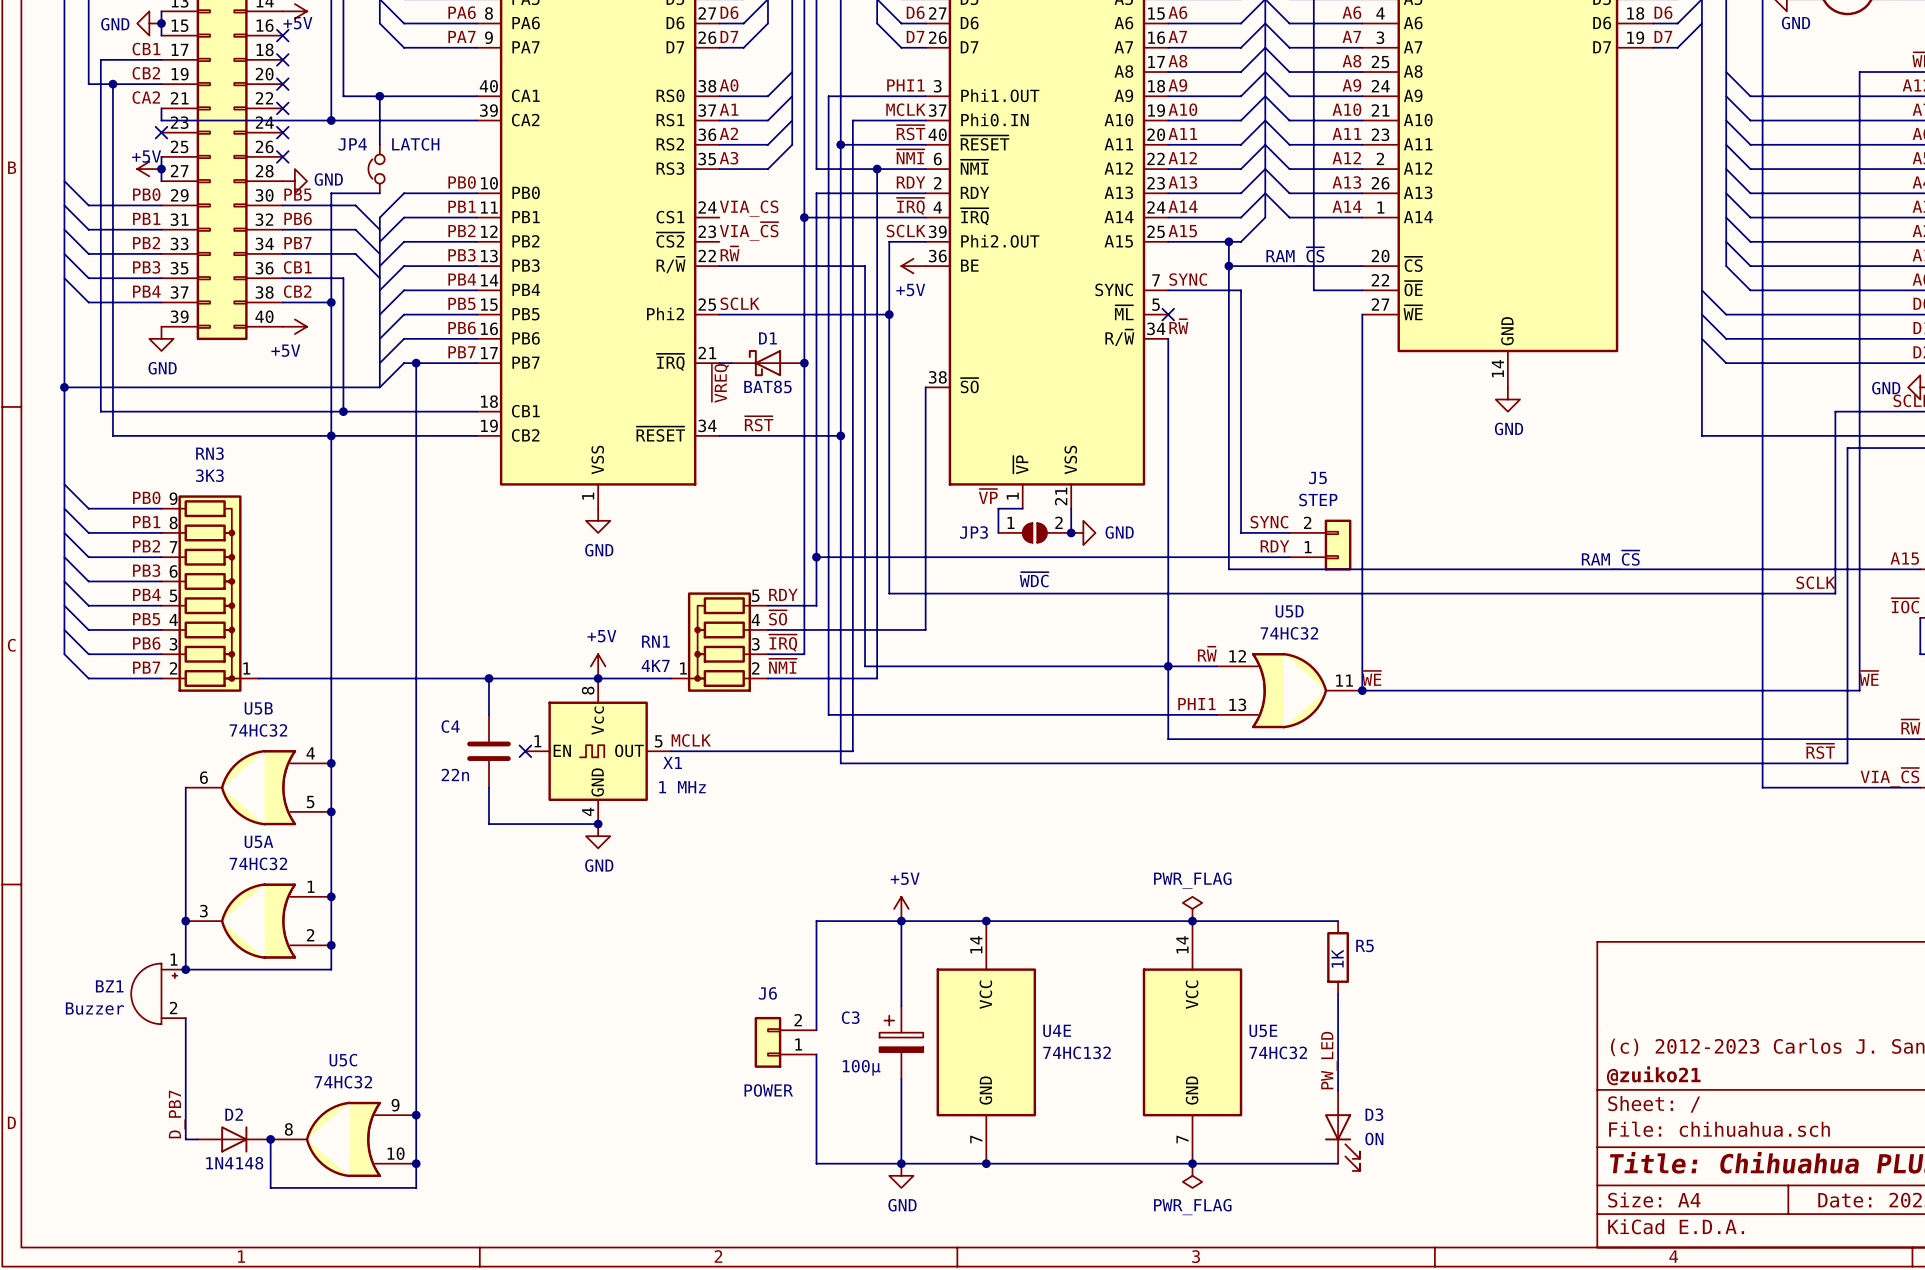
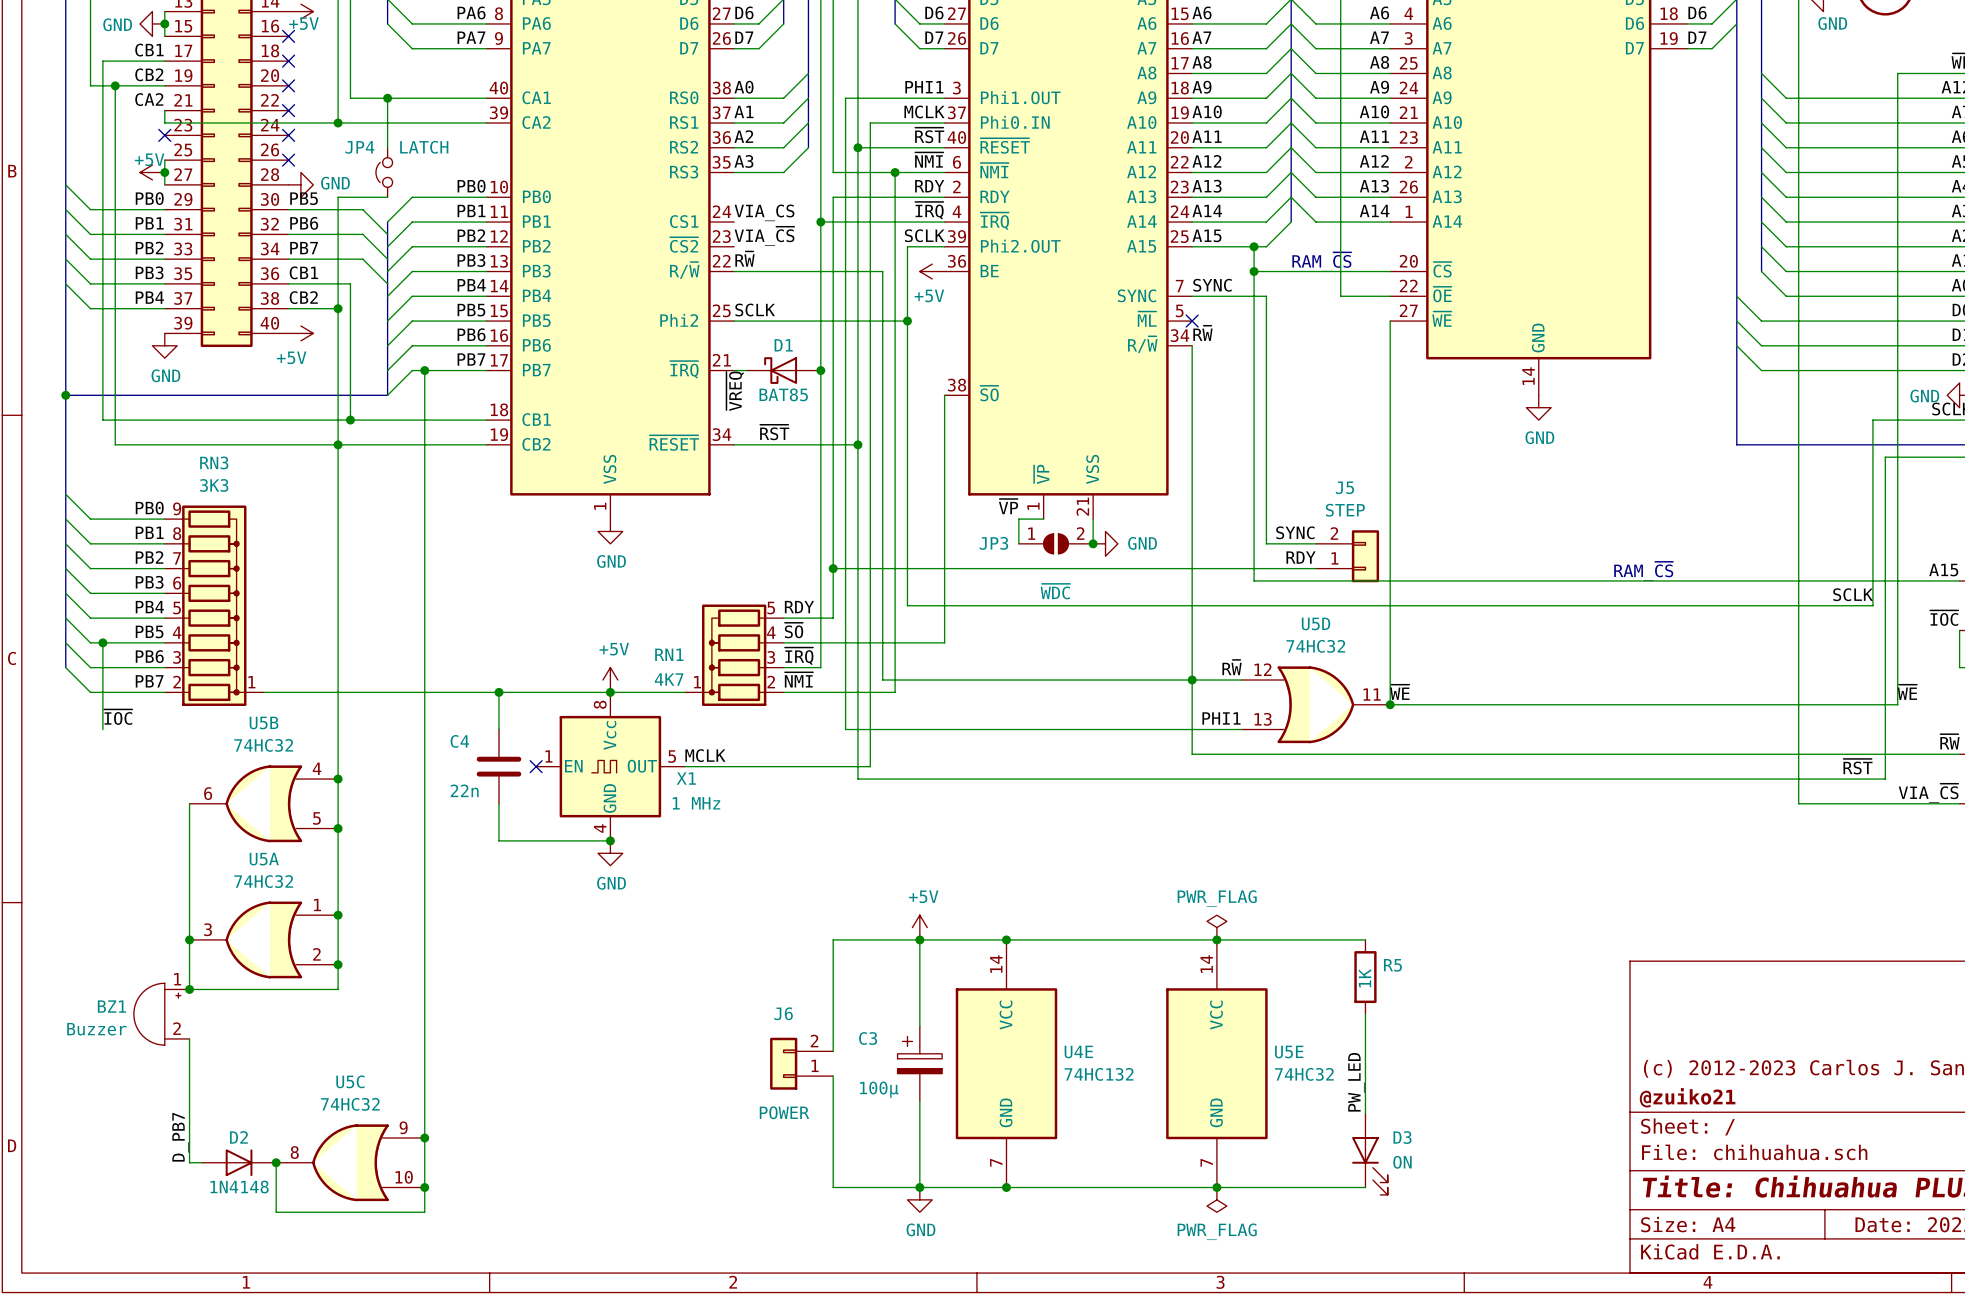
wire: none -> (102, 642) (102, 729)
junction: none -> (102, 642)
label: none -> ~{IOC} (118, 717)

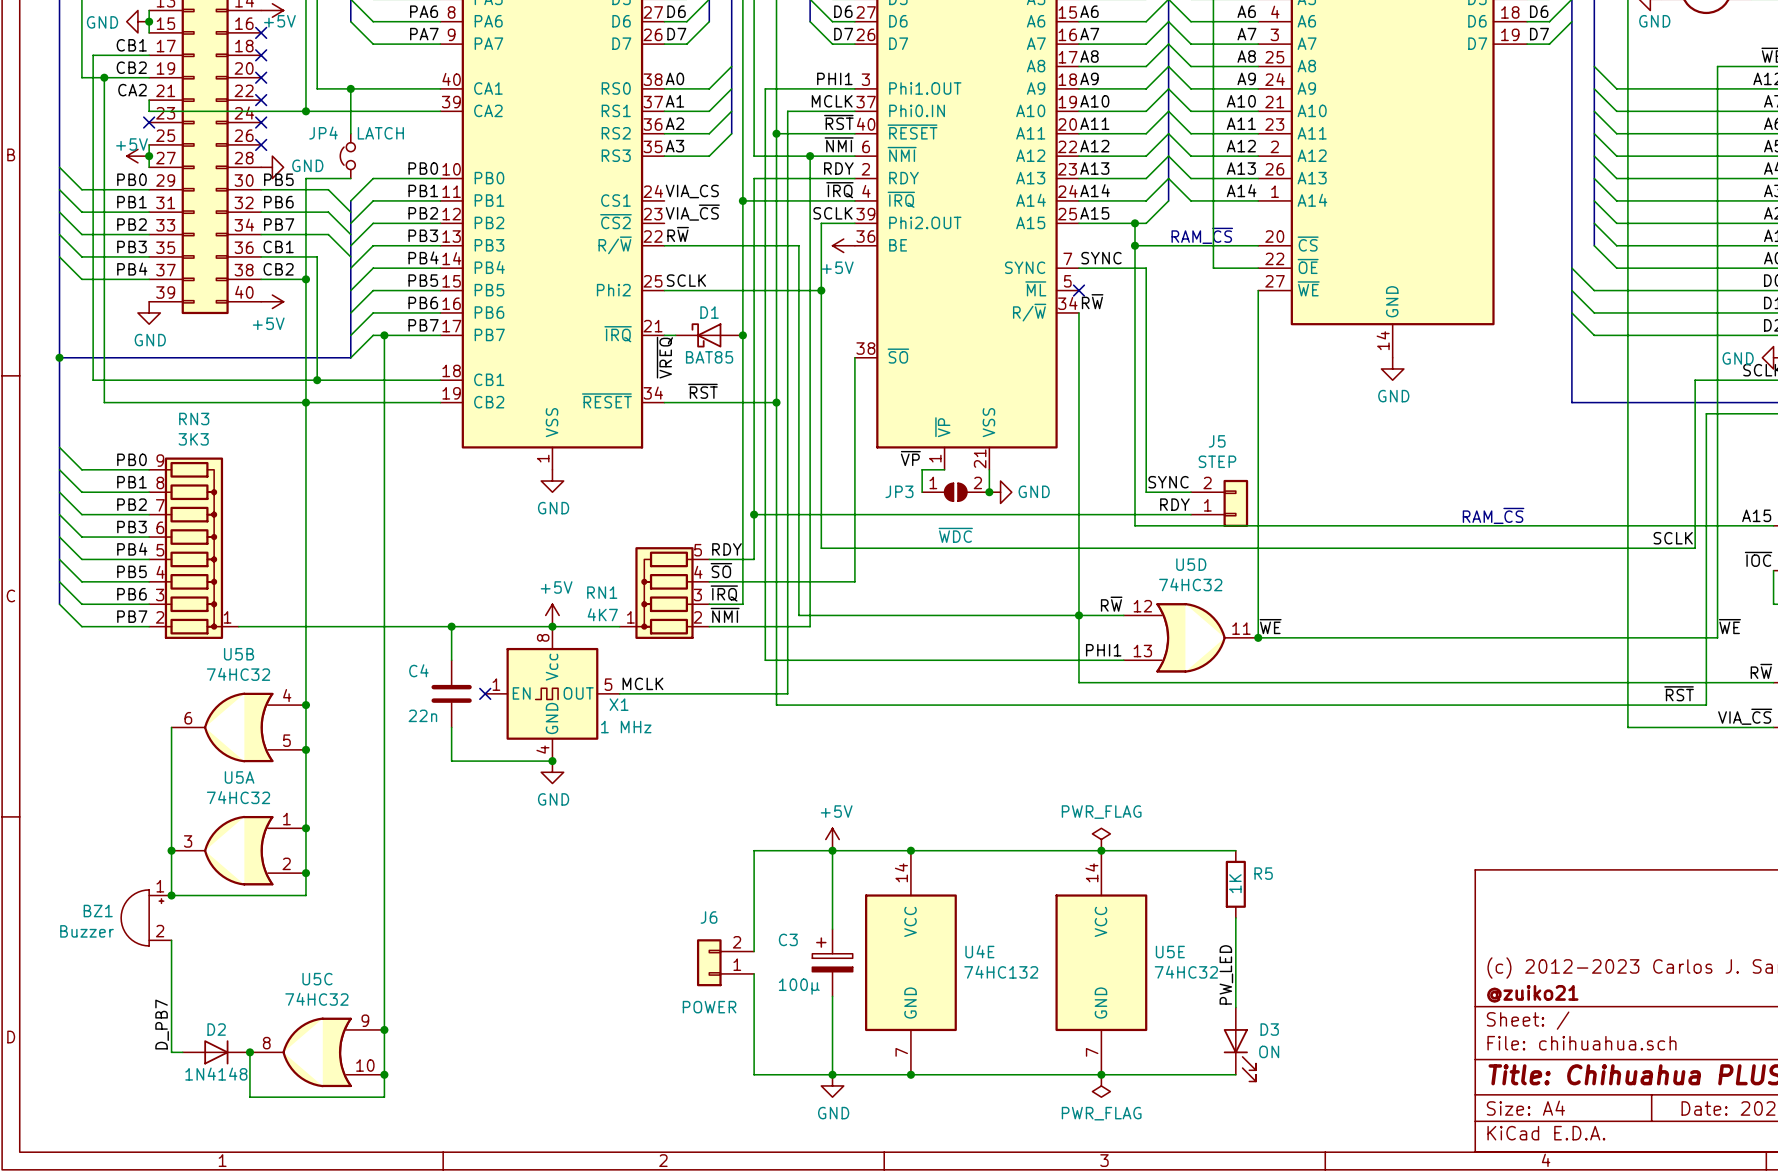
wire: (102, 642) (102, 729) -> none
junction: (102, 642) -> none
label: ~{IOC} (118, 717) -> none
label: ~{RW} (1949, 741) -> R~{W} (1761, 671)

